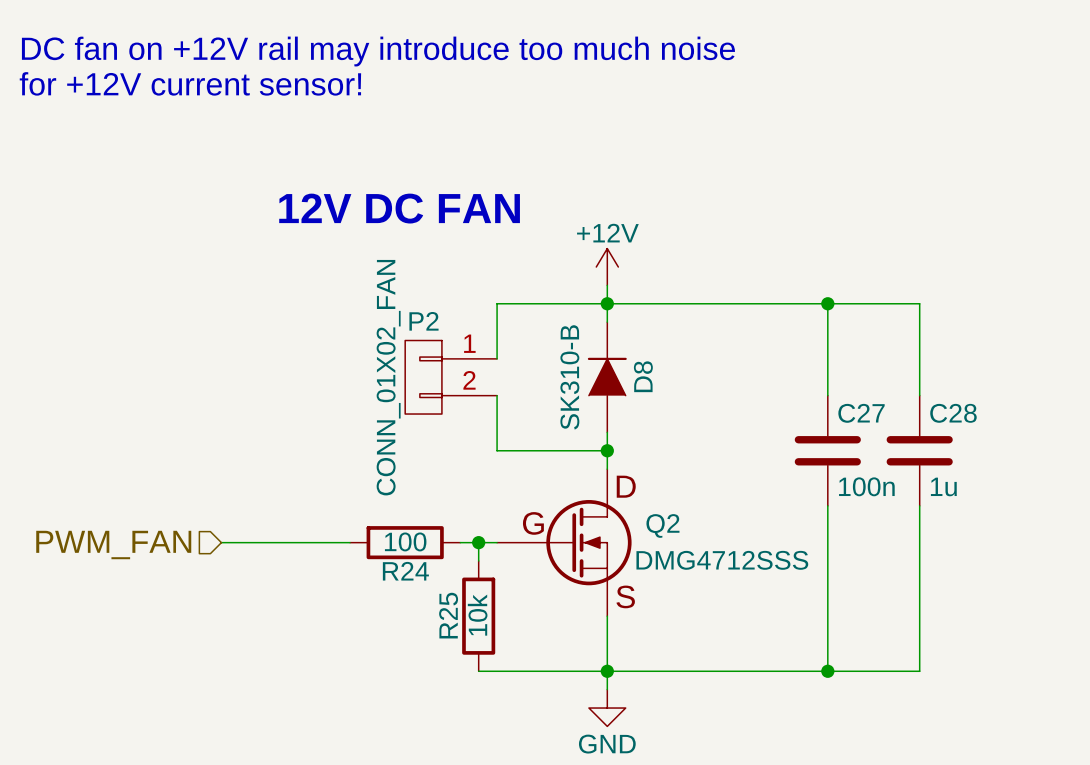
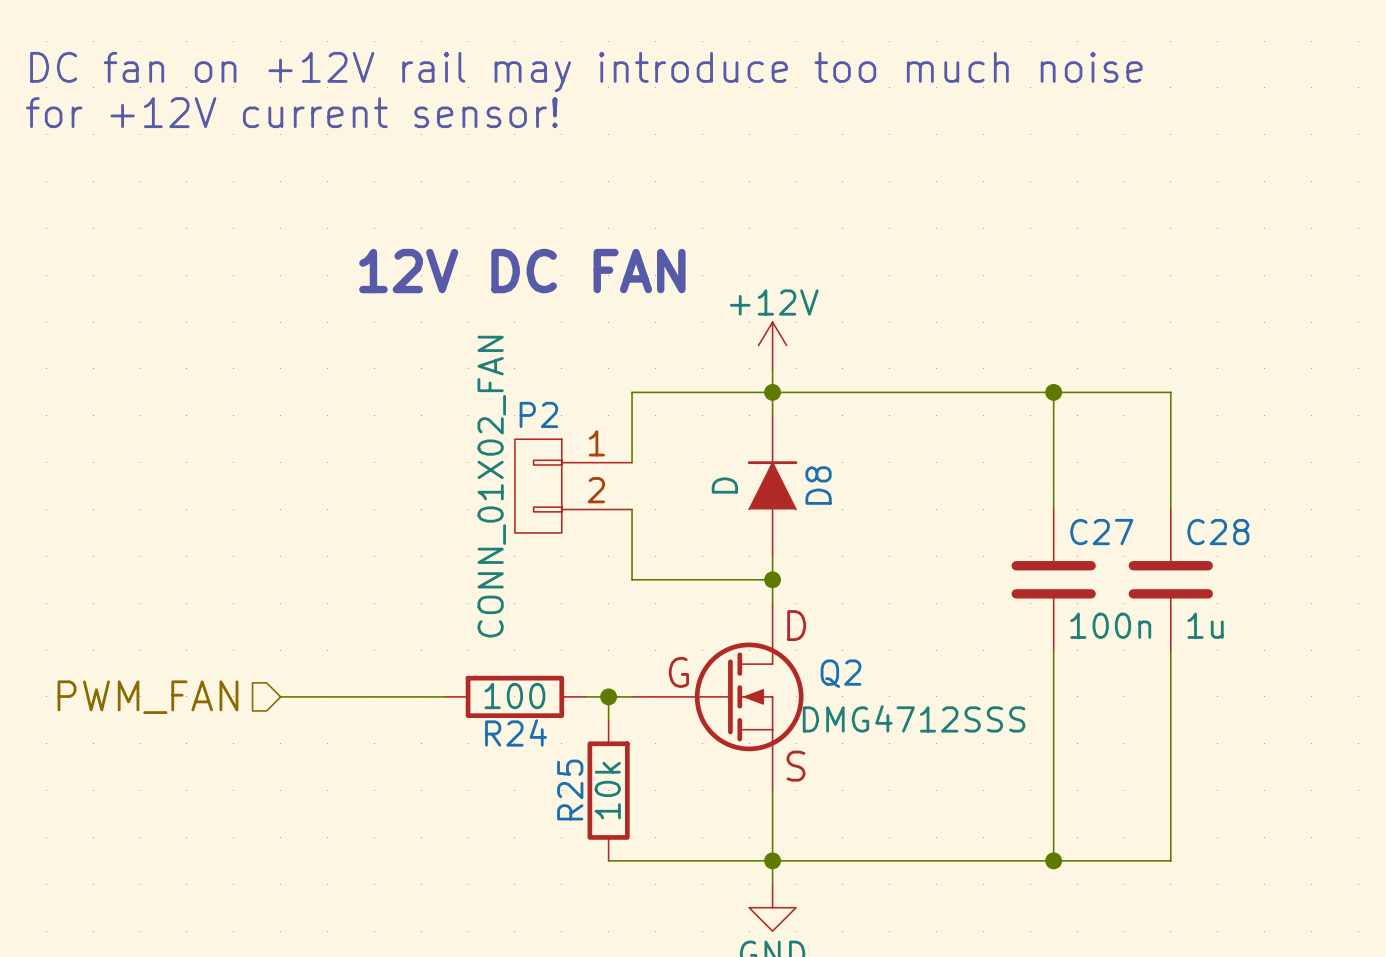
D8 value: SK310-B (569, 377) -> D (724, 485)

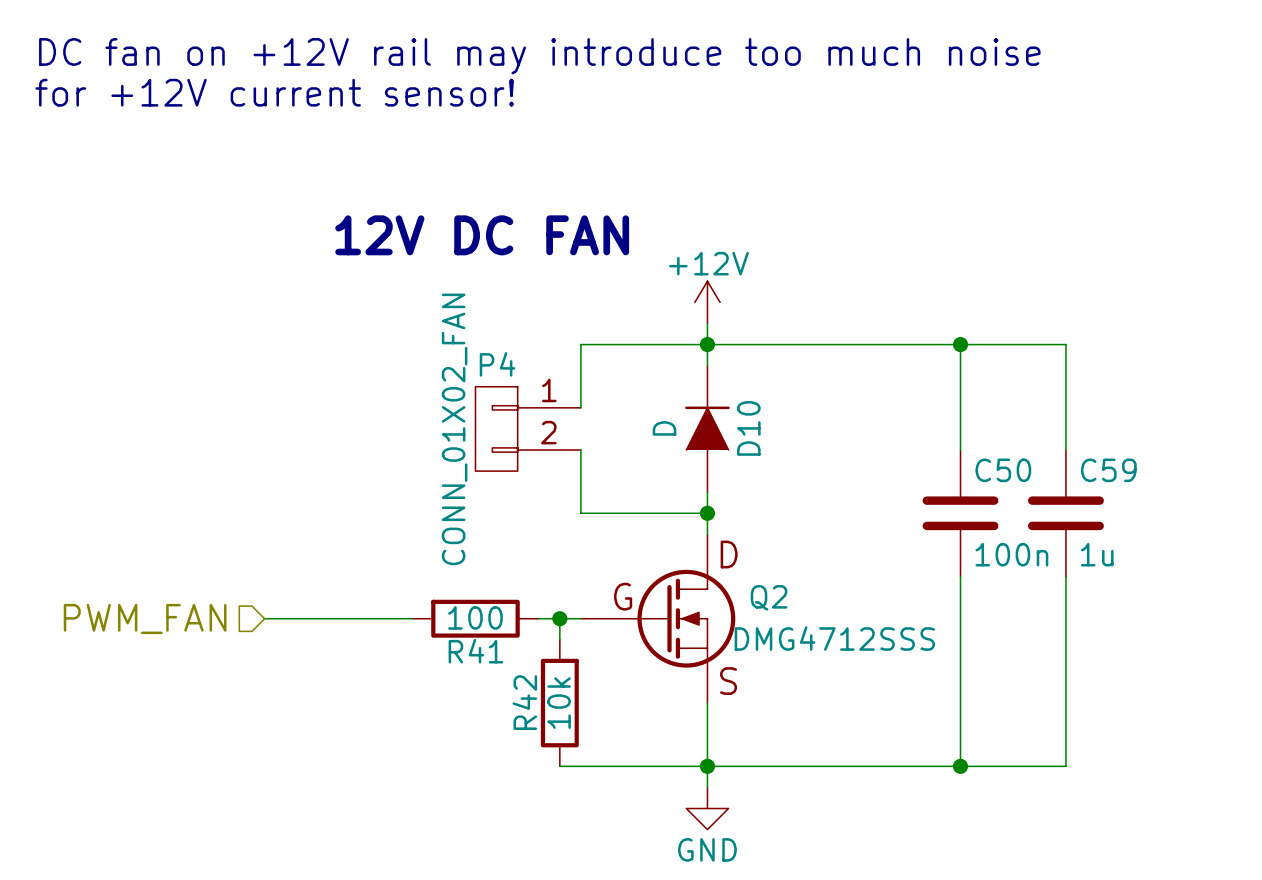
P2 name: P2 (538, 414) -> P4 (497, 364)
D8 name: D8 (818, 485) -> D10 (748, 428)
C27 name: C27 (1101, 532) -> C50 (1003, 470)
C28 name: C28 (1218, 532) -> C59 (1108, 470)
R24 name: R24 (516, 732) -> R41 (475, 651)
R25 name: R25 (570, 790) -> R42 (524, 702)

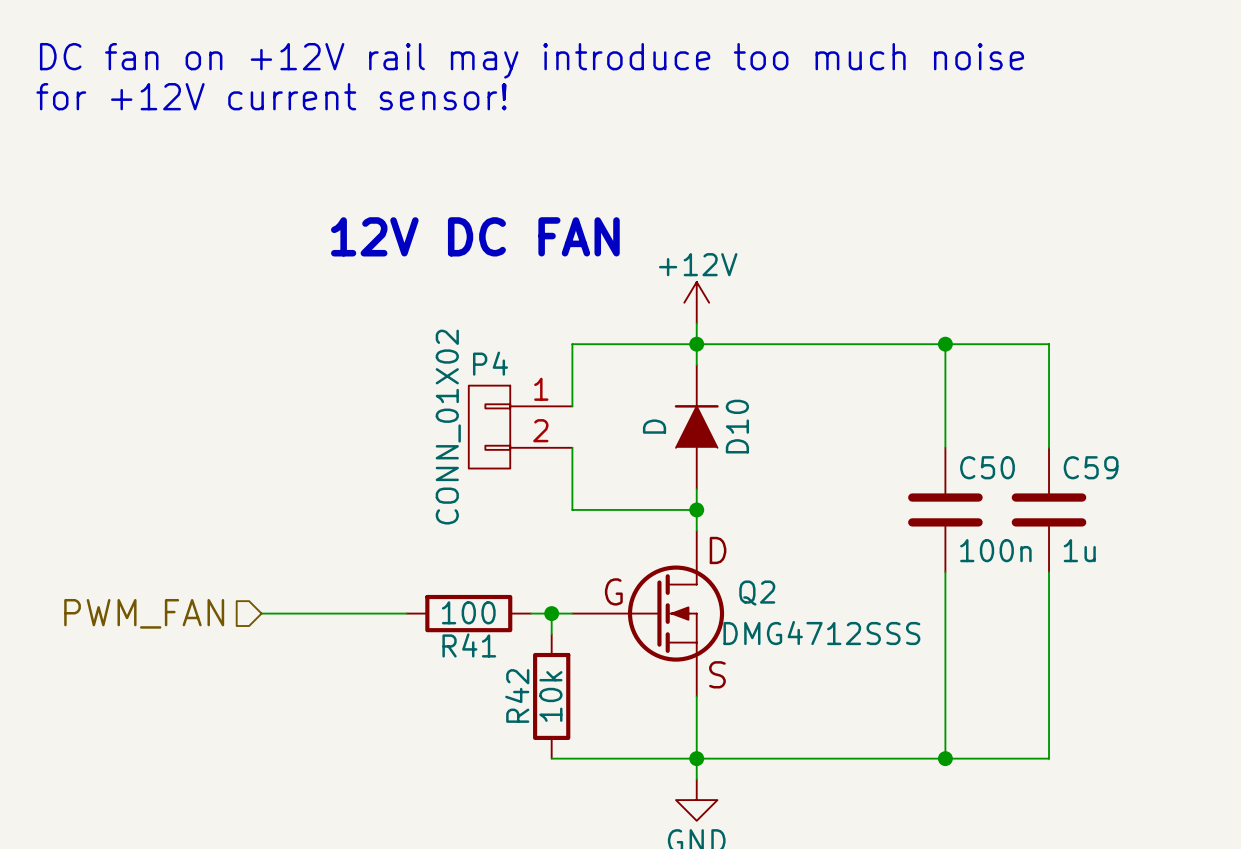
P4 value: CONN_01X02_FAN (454, 429) -> CONN_01X02 (448, 427)

